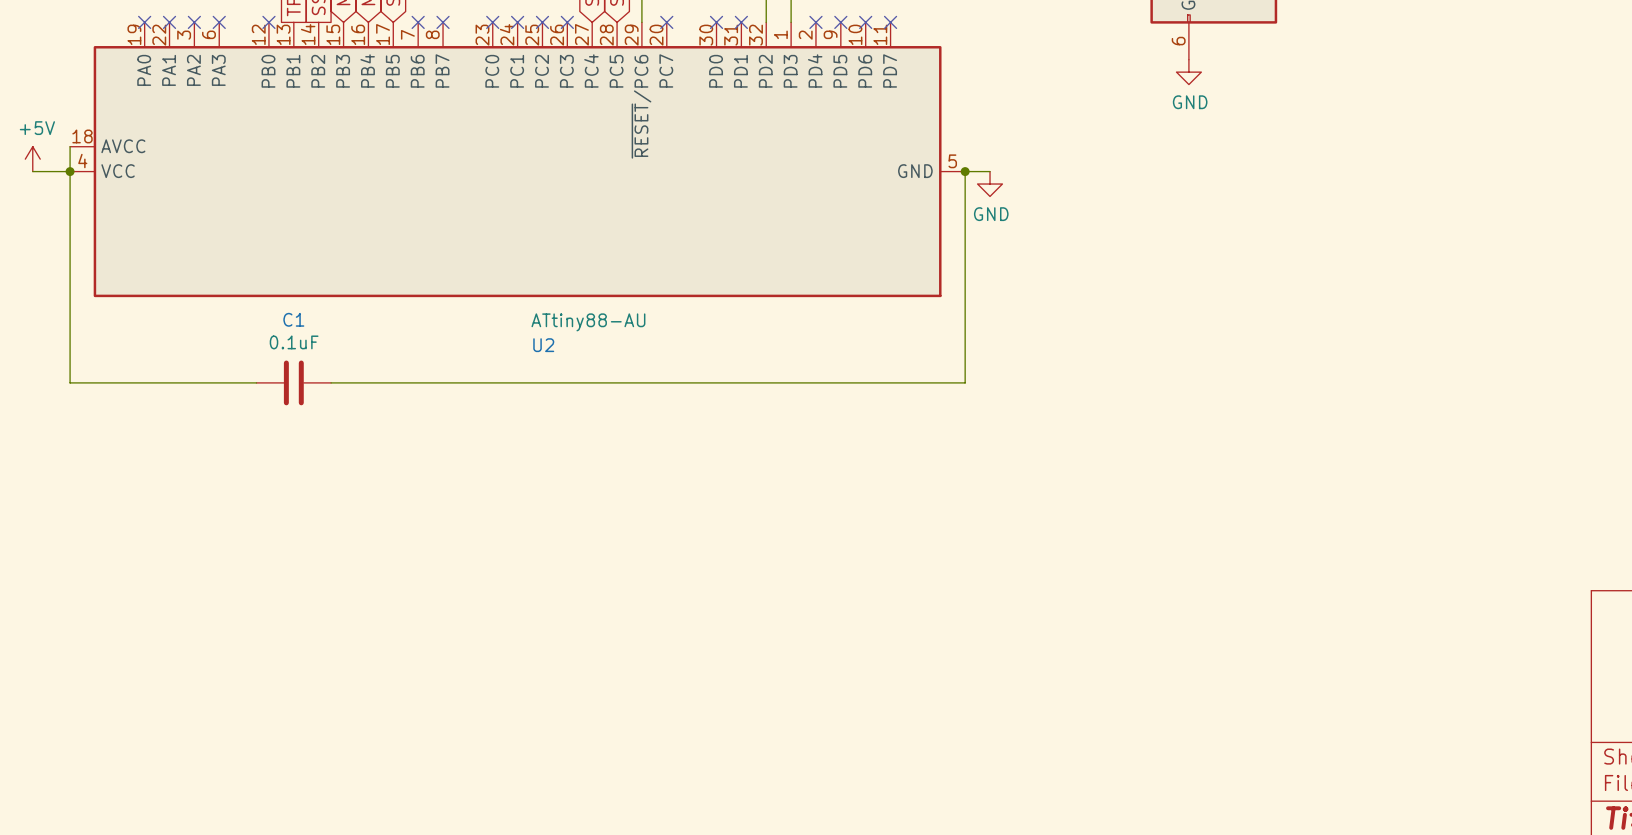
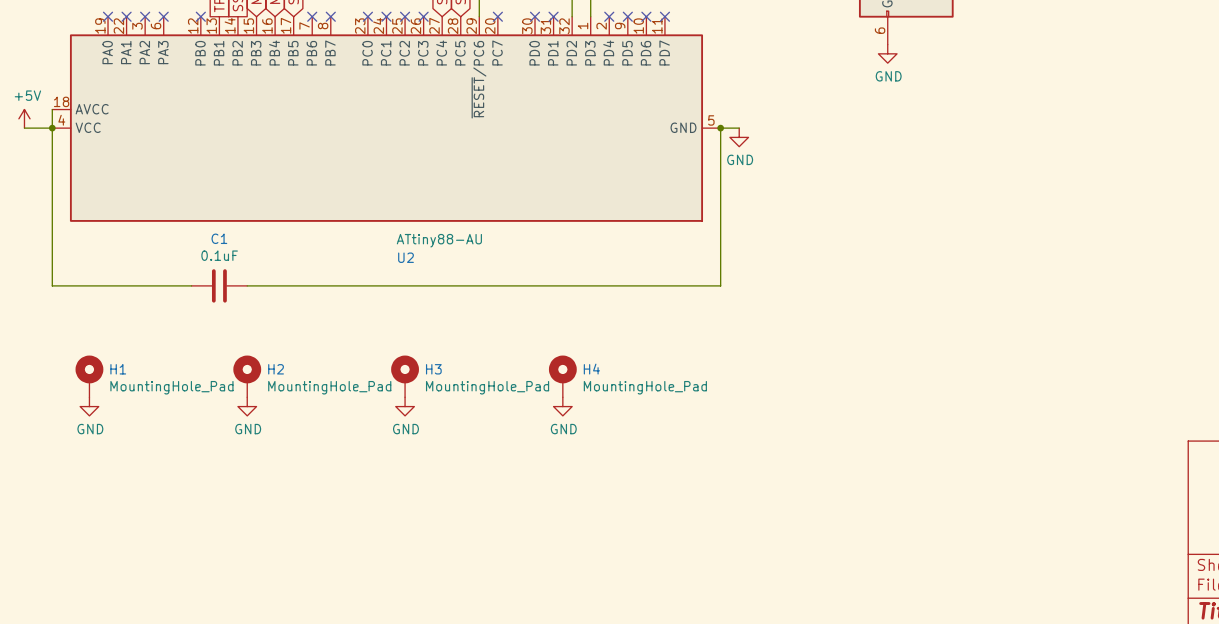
H1: none -> MountingHole_Pad (89, 376)
H2: none -> MountingHole_Pad (247, 376)
H3: none -> MountingHole_Pad (405, 376)
H4: none -> MountingHole_Pad (562, 376)
power symbol: none -> GND (89, 406)
power symbol: none -> GND (247, 406)
power symbol: none -> GND (405, 406)
power symbol: none -> GND (562, 406)

